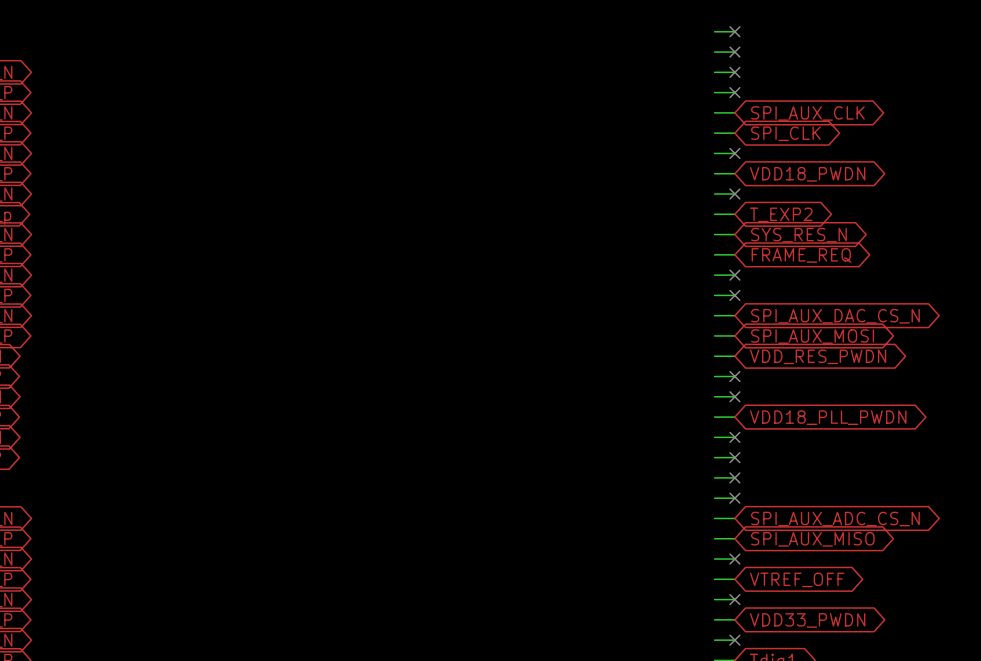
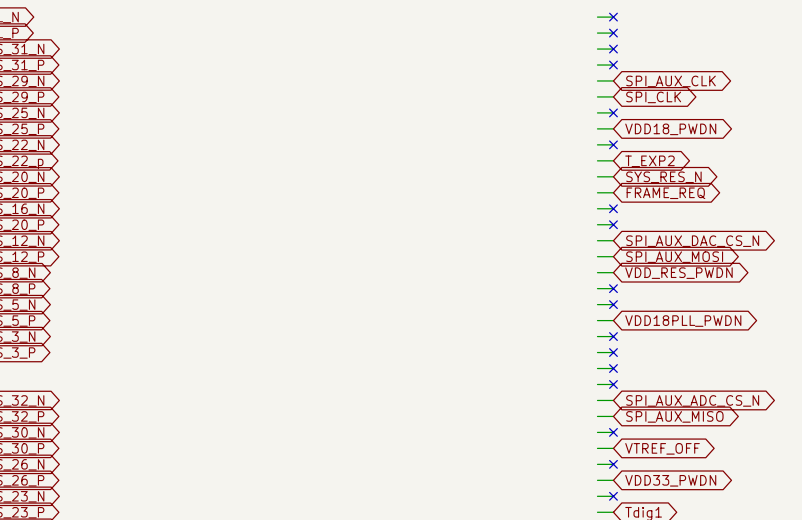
global label: VDD18_PLL_PWDN (828, 417) -> VDD18PLL_PWDN (683, 321)

